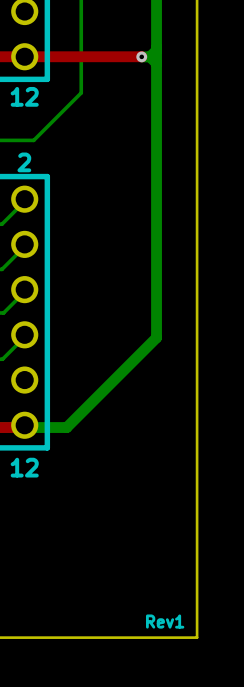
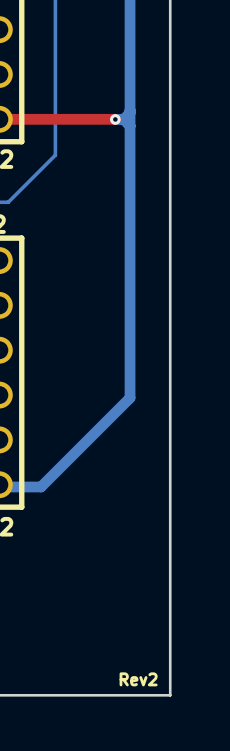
text: Rev1 (165, 621) -> Rev2 (138, 679)

